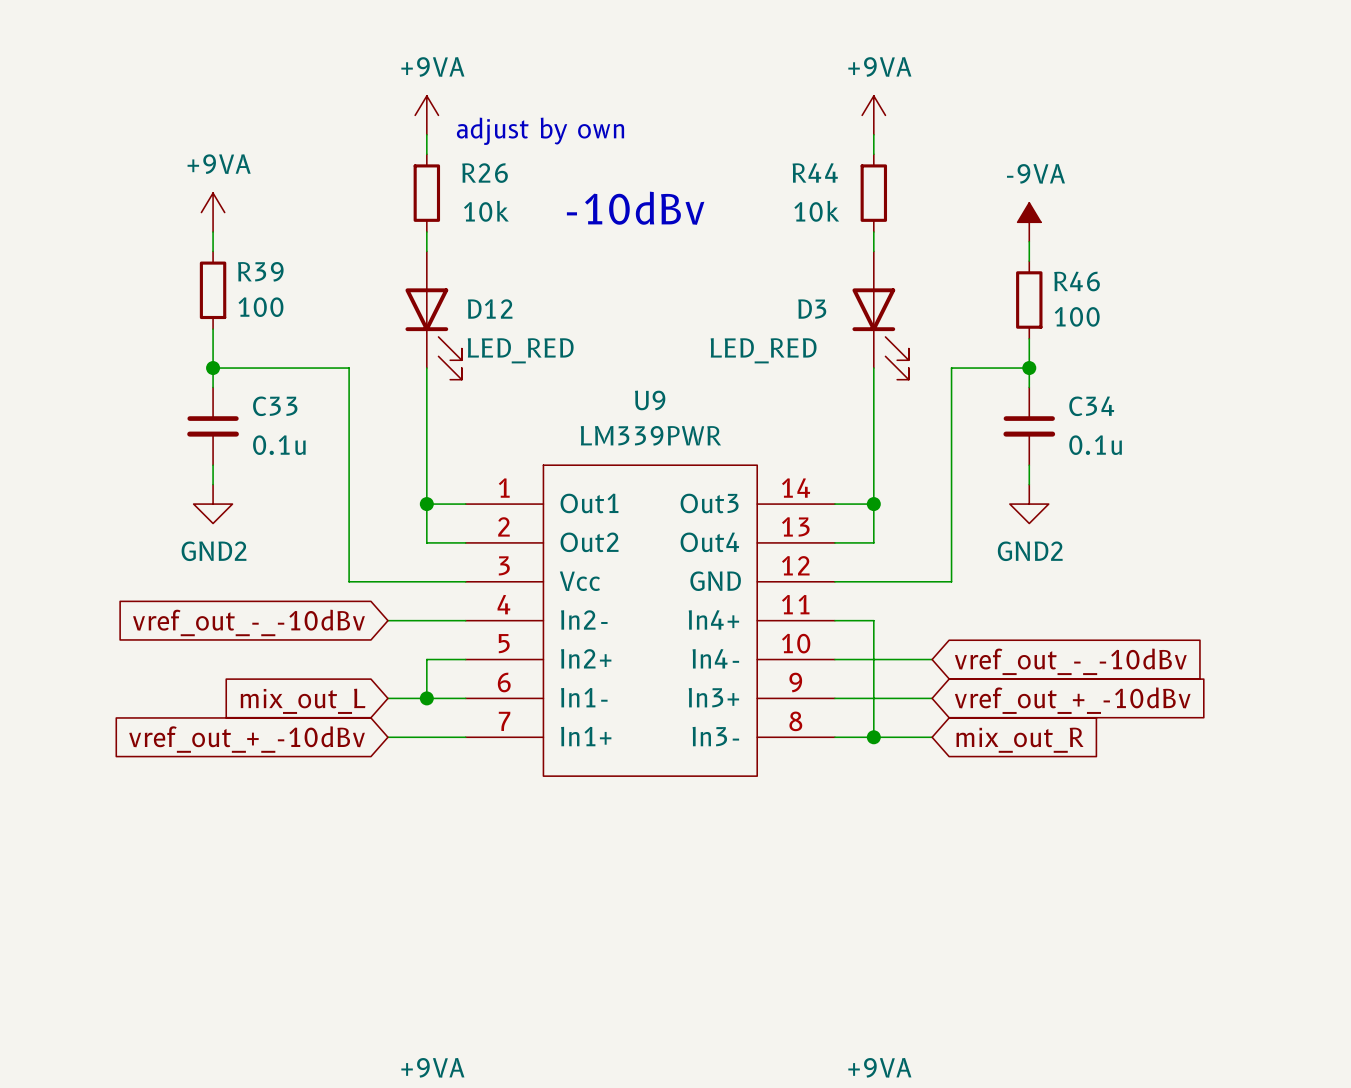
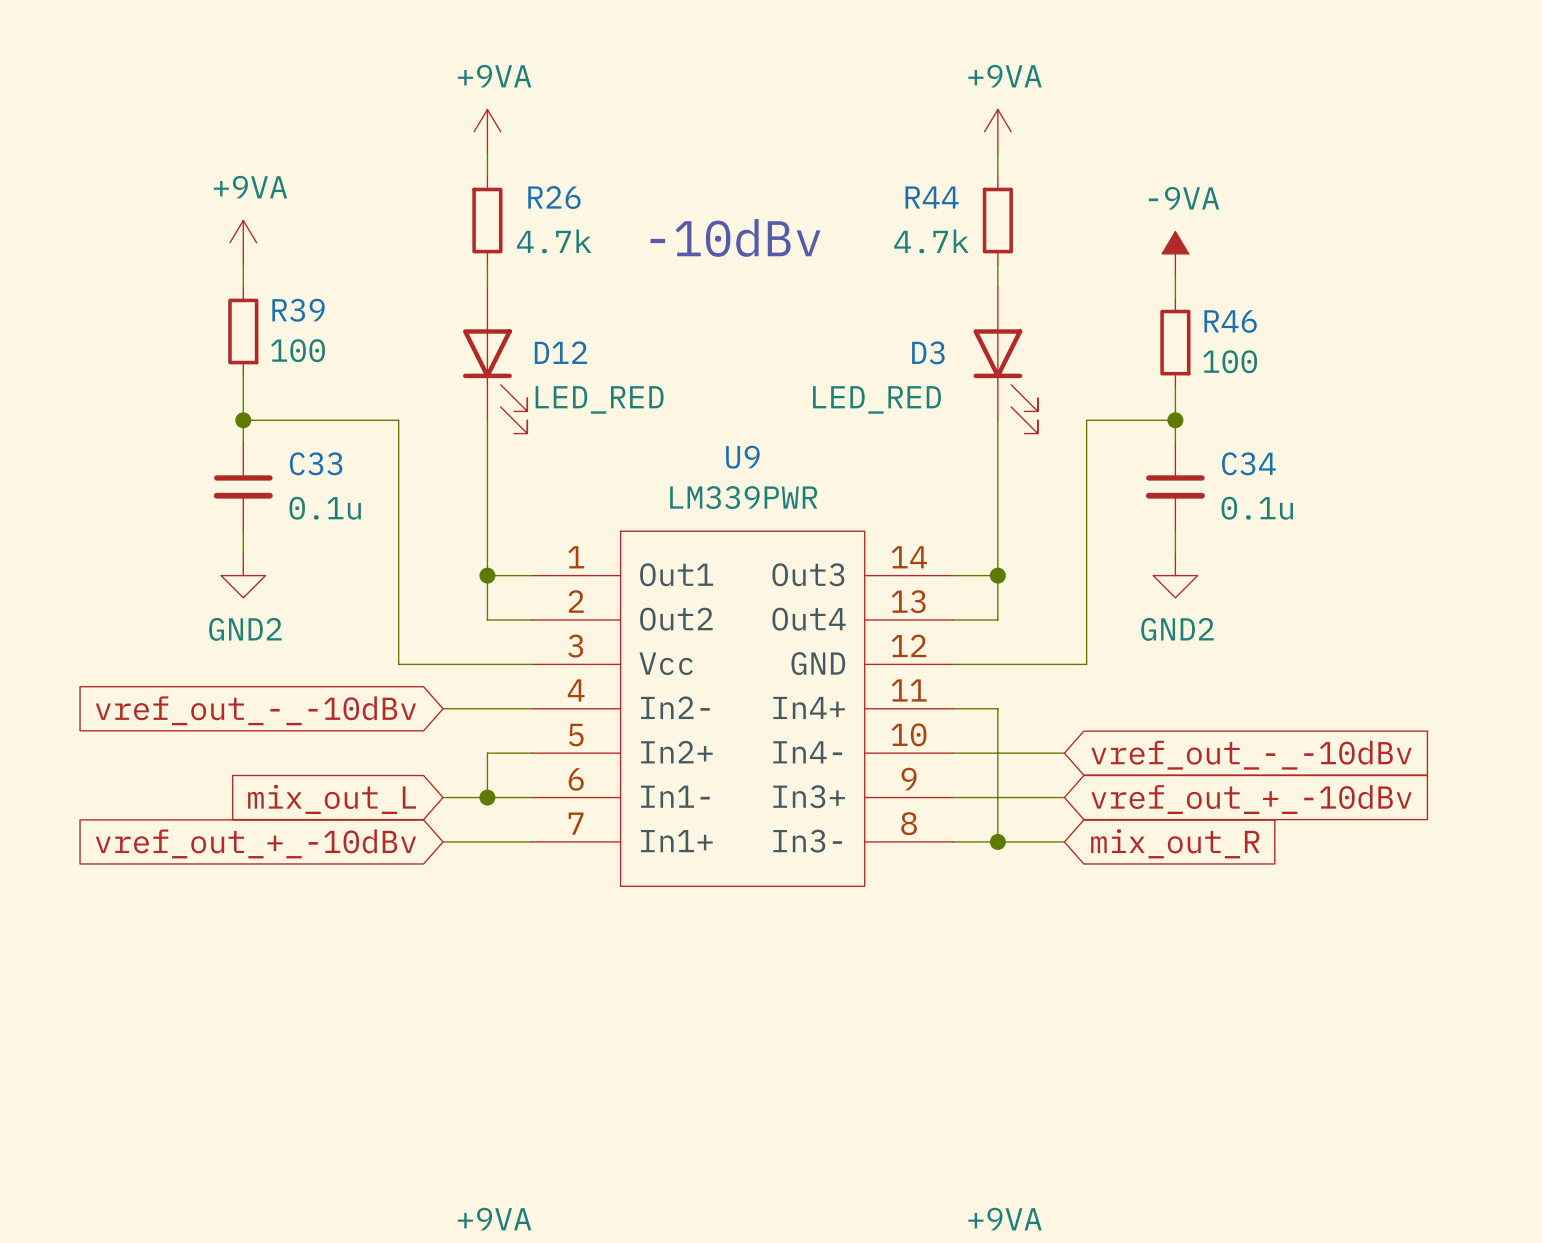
text: adjust by own (540, 131) -> none
R26 value: 10k (486, 211) -> 4.7k (554, 241)
R44 value: 10k (816, 211) -> 4.7k (931, 241)

